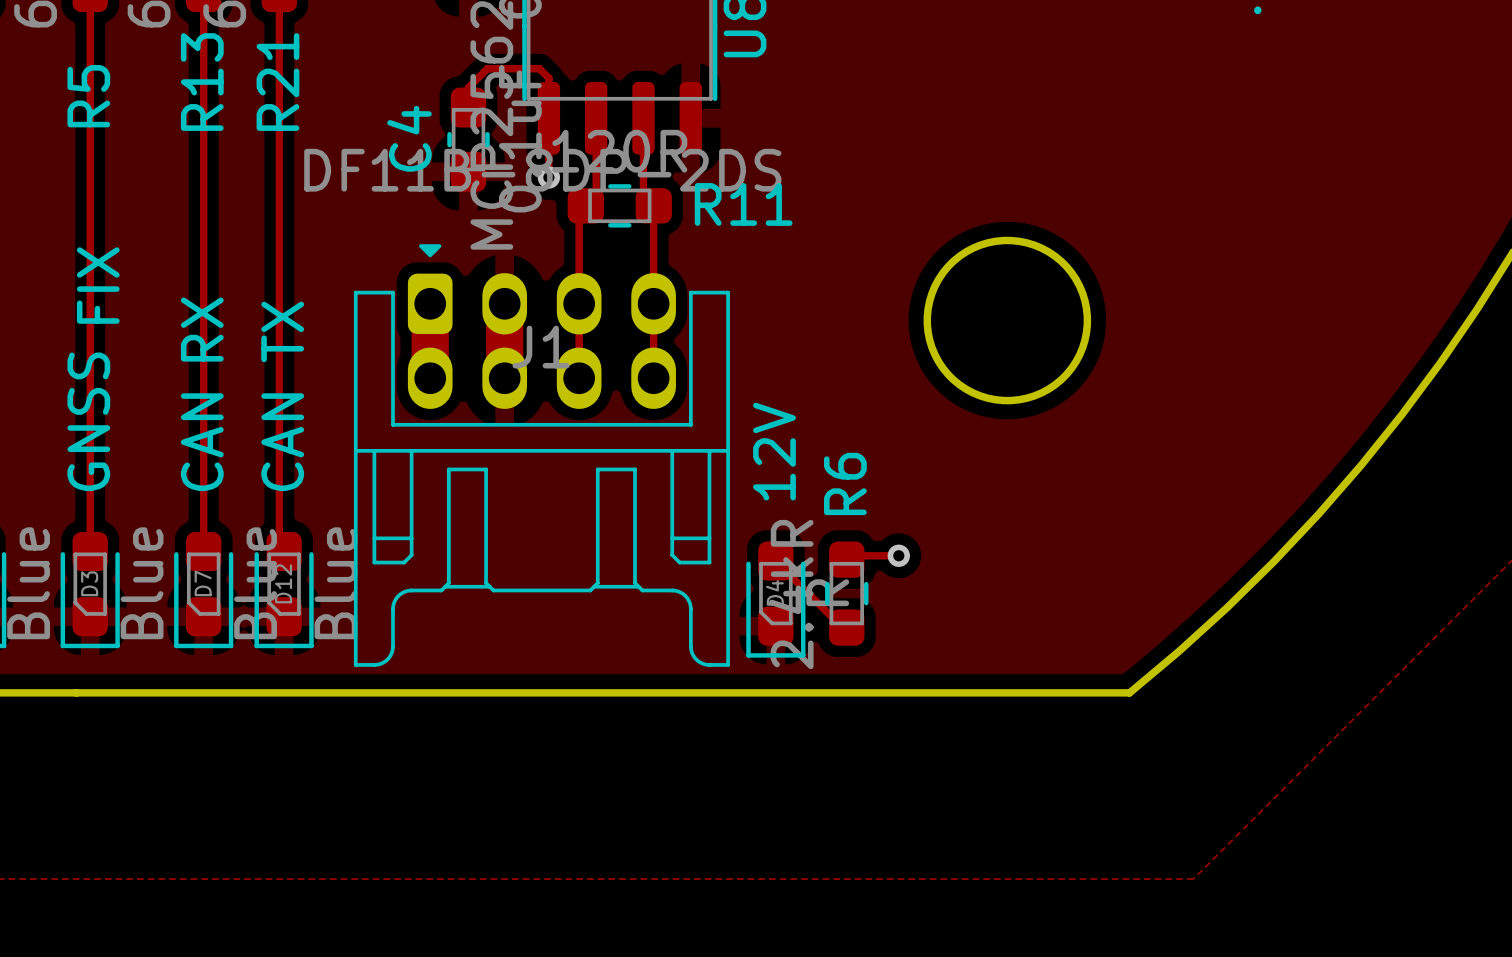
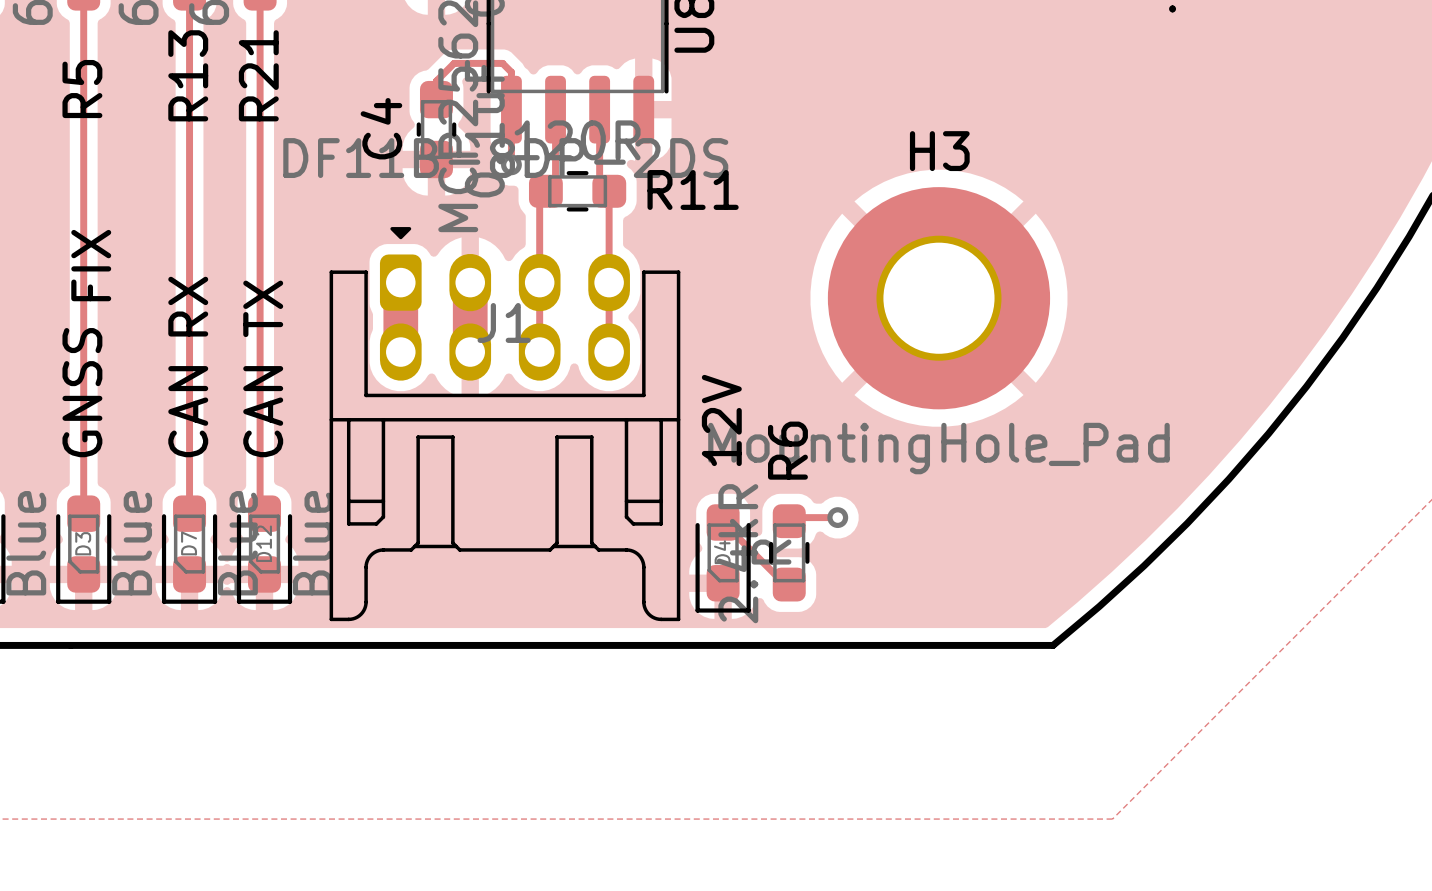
round board edge: [923, 236, 1092, 405] -> none
H3: none -> MountingHole_Pad (938, 298)

